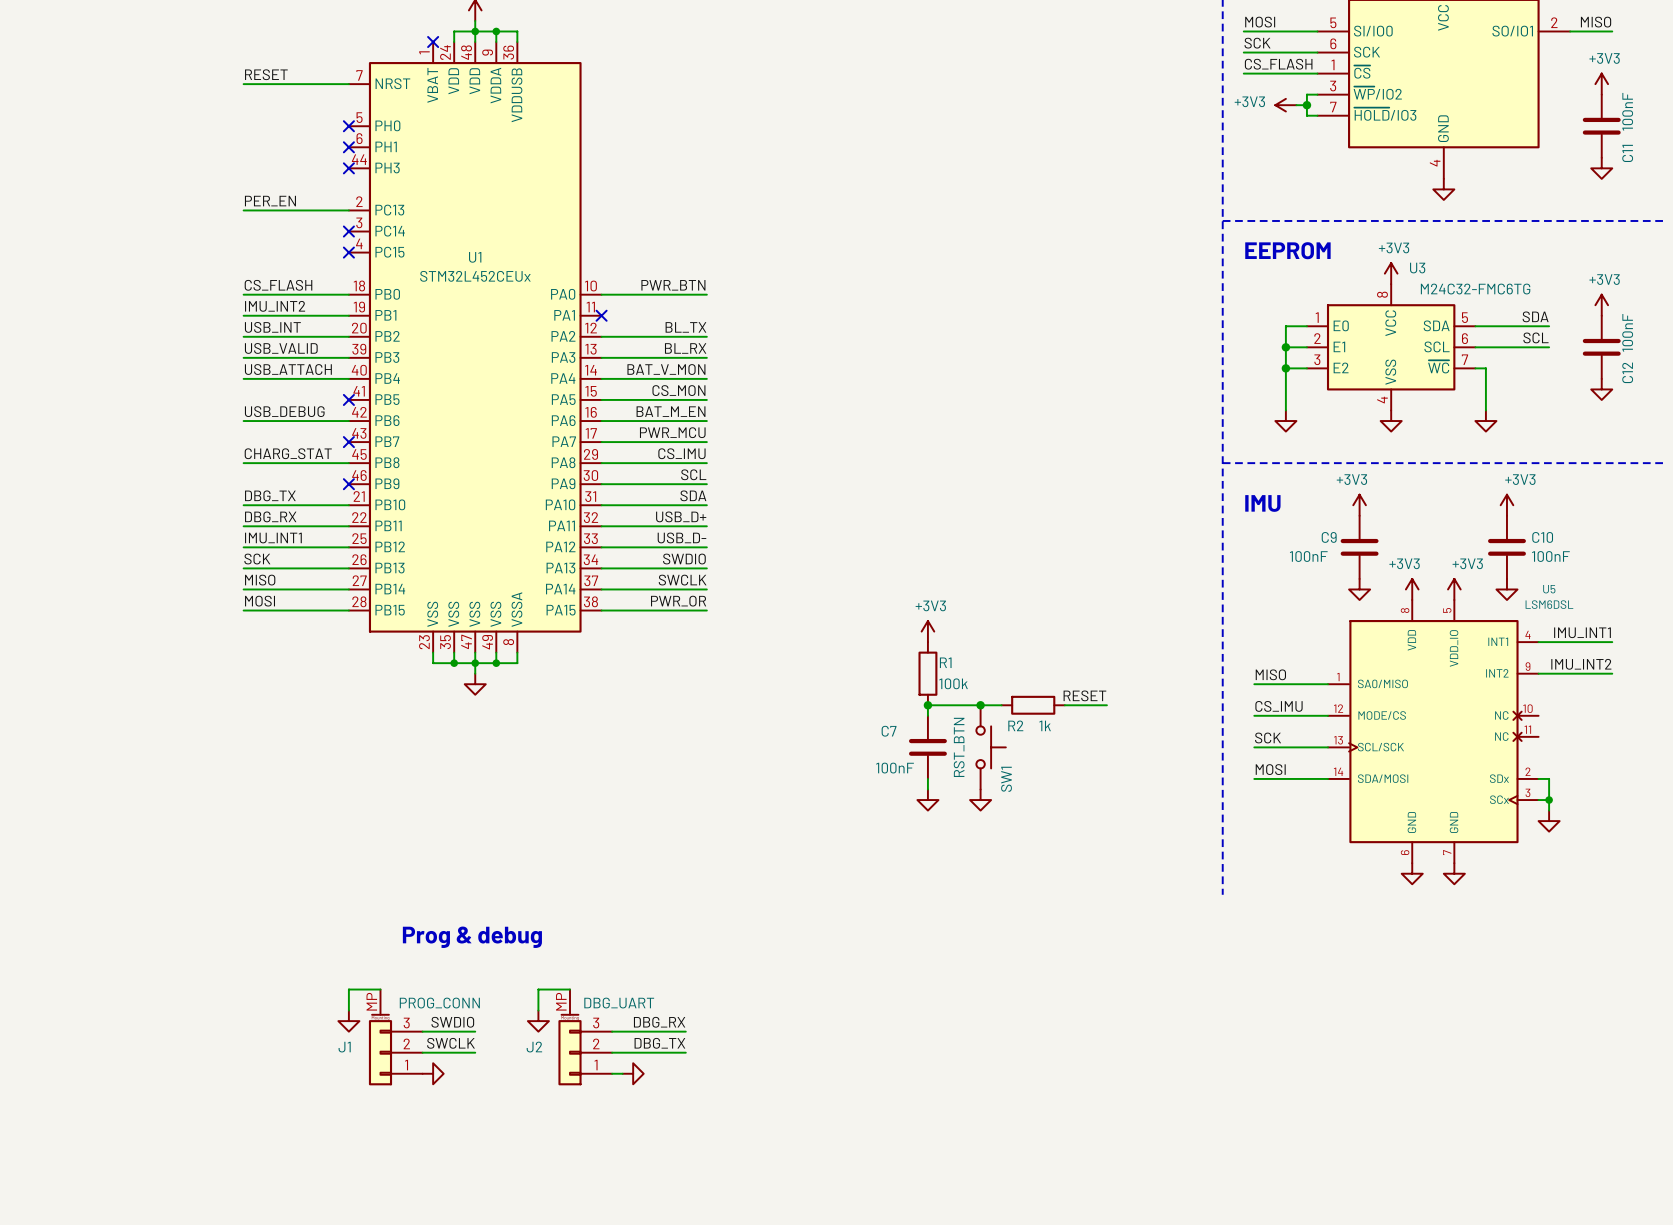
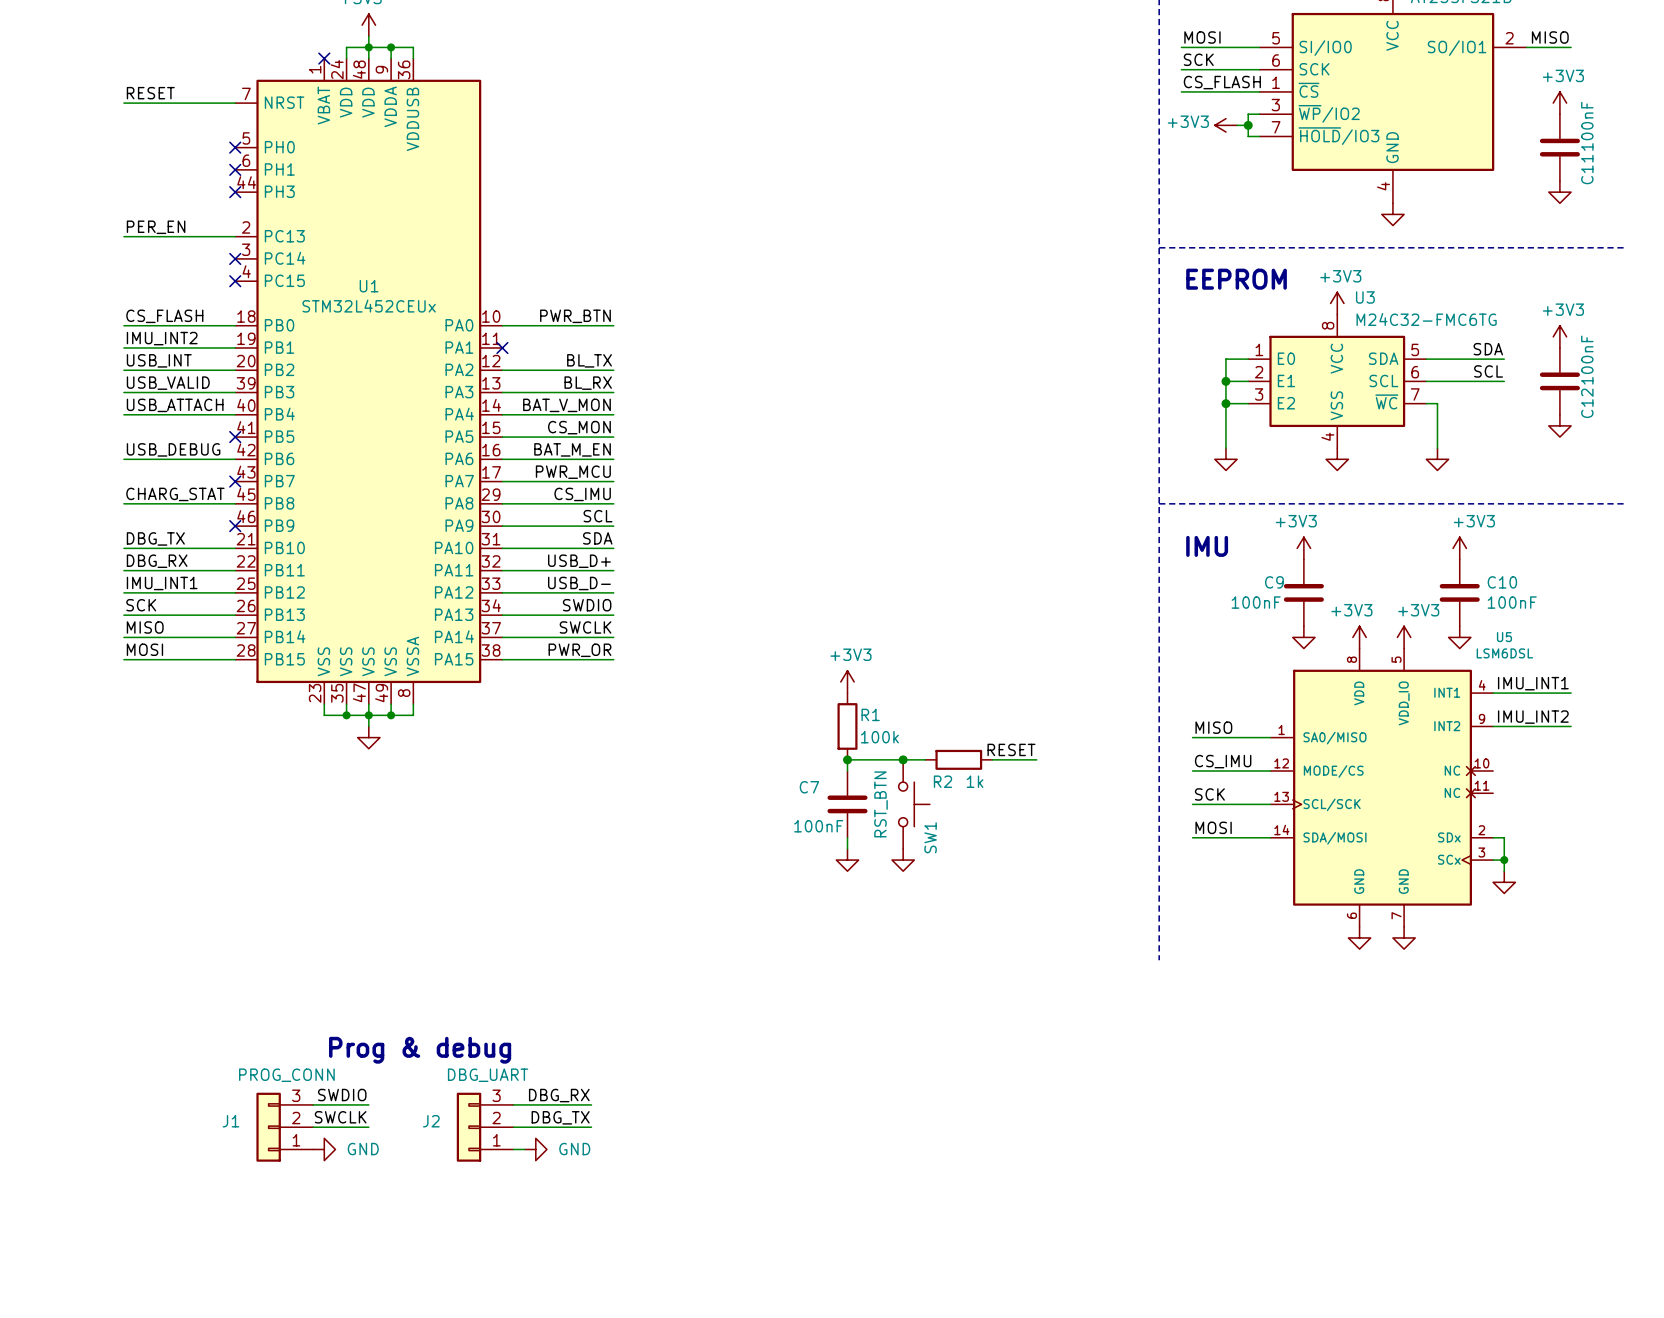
text position: Prog & debug (472, 937) -> Prog & debug (420, 1050)
J1 symbol: [368, 989, 423, 1086] -> [256, 1092, 314, 1162]
wire: (380, 989) (348, 989) (348, 1010) -> none
J2 symbol: [558, 989, 613, 1086] -> [456, 1092, 514, 1162]
wire: (569, 989) (538, 989) (538, 1010) -> none
J1 value position: PROG_CONN (439, 1003) -> PROG_CONN (286, 1075)
J2 value position: DBG_UART (619, 1003) -> DBG_UART (488, 1075)
power symbol: (348, 1021) -> none
power symbol: (538, 1021) -> none
power symbol text: none -> GND (363, 1149)
power symbol text: none -> GND (574, 1149)

